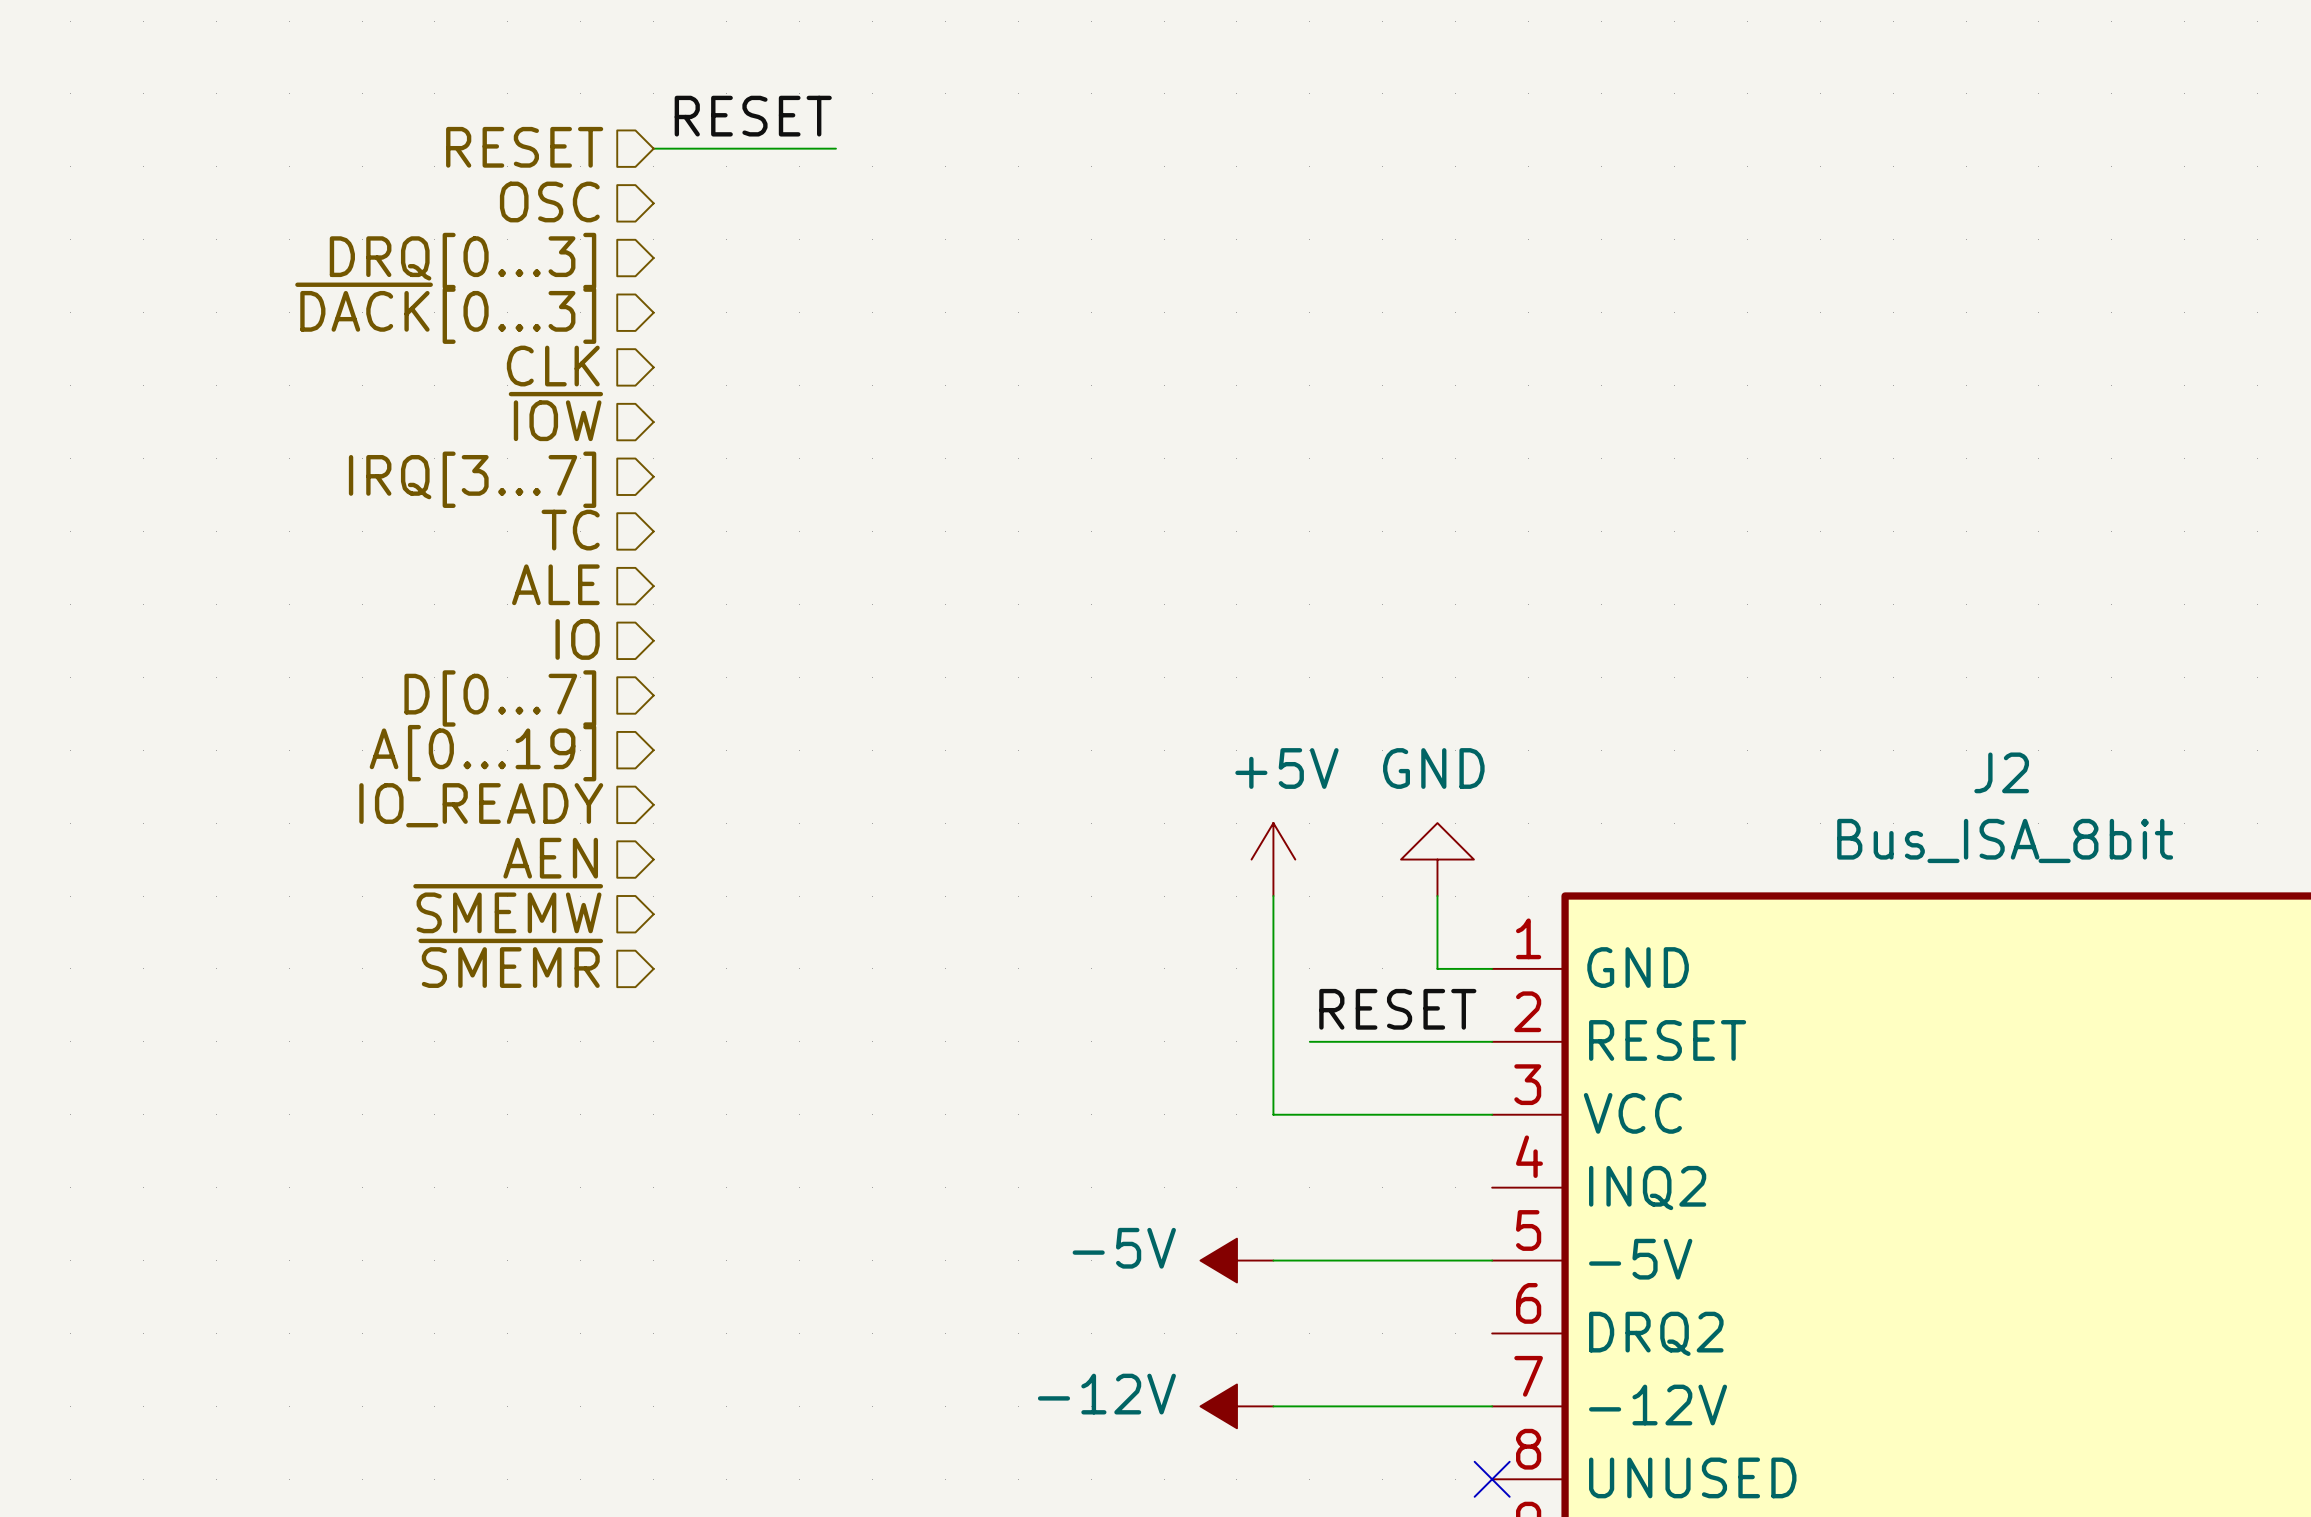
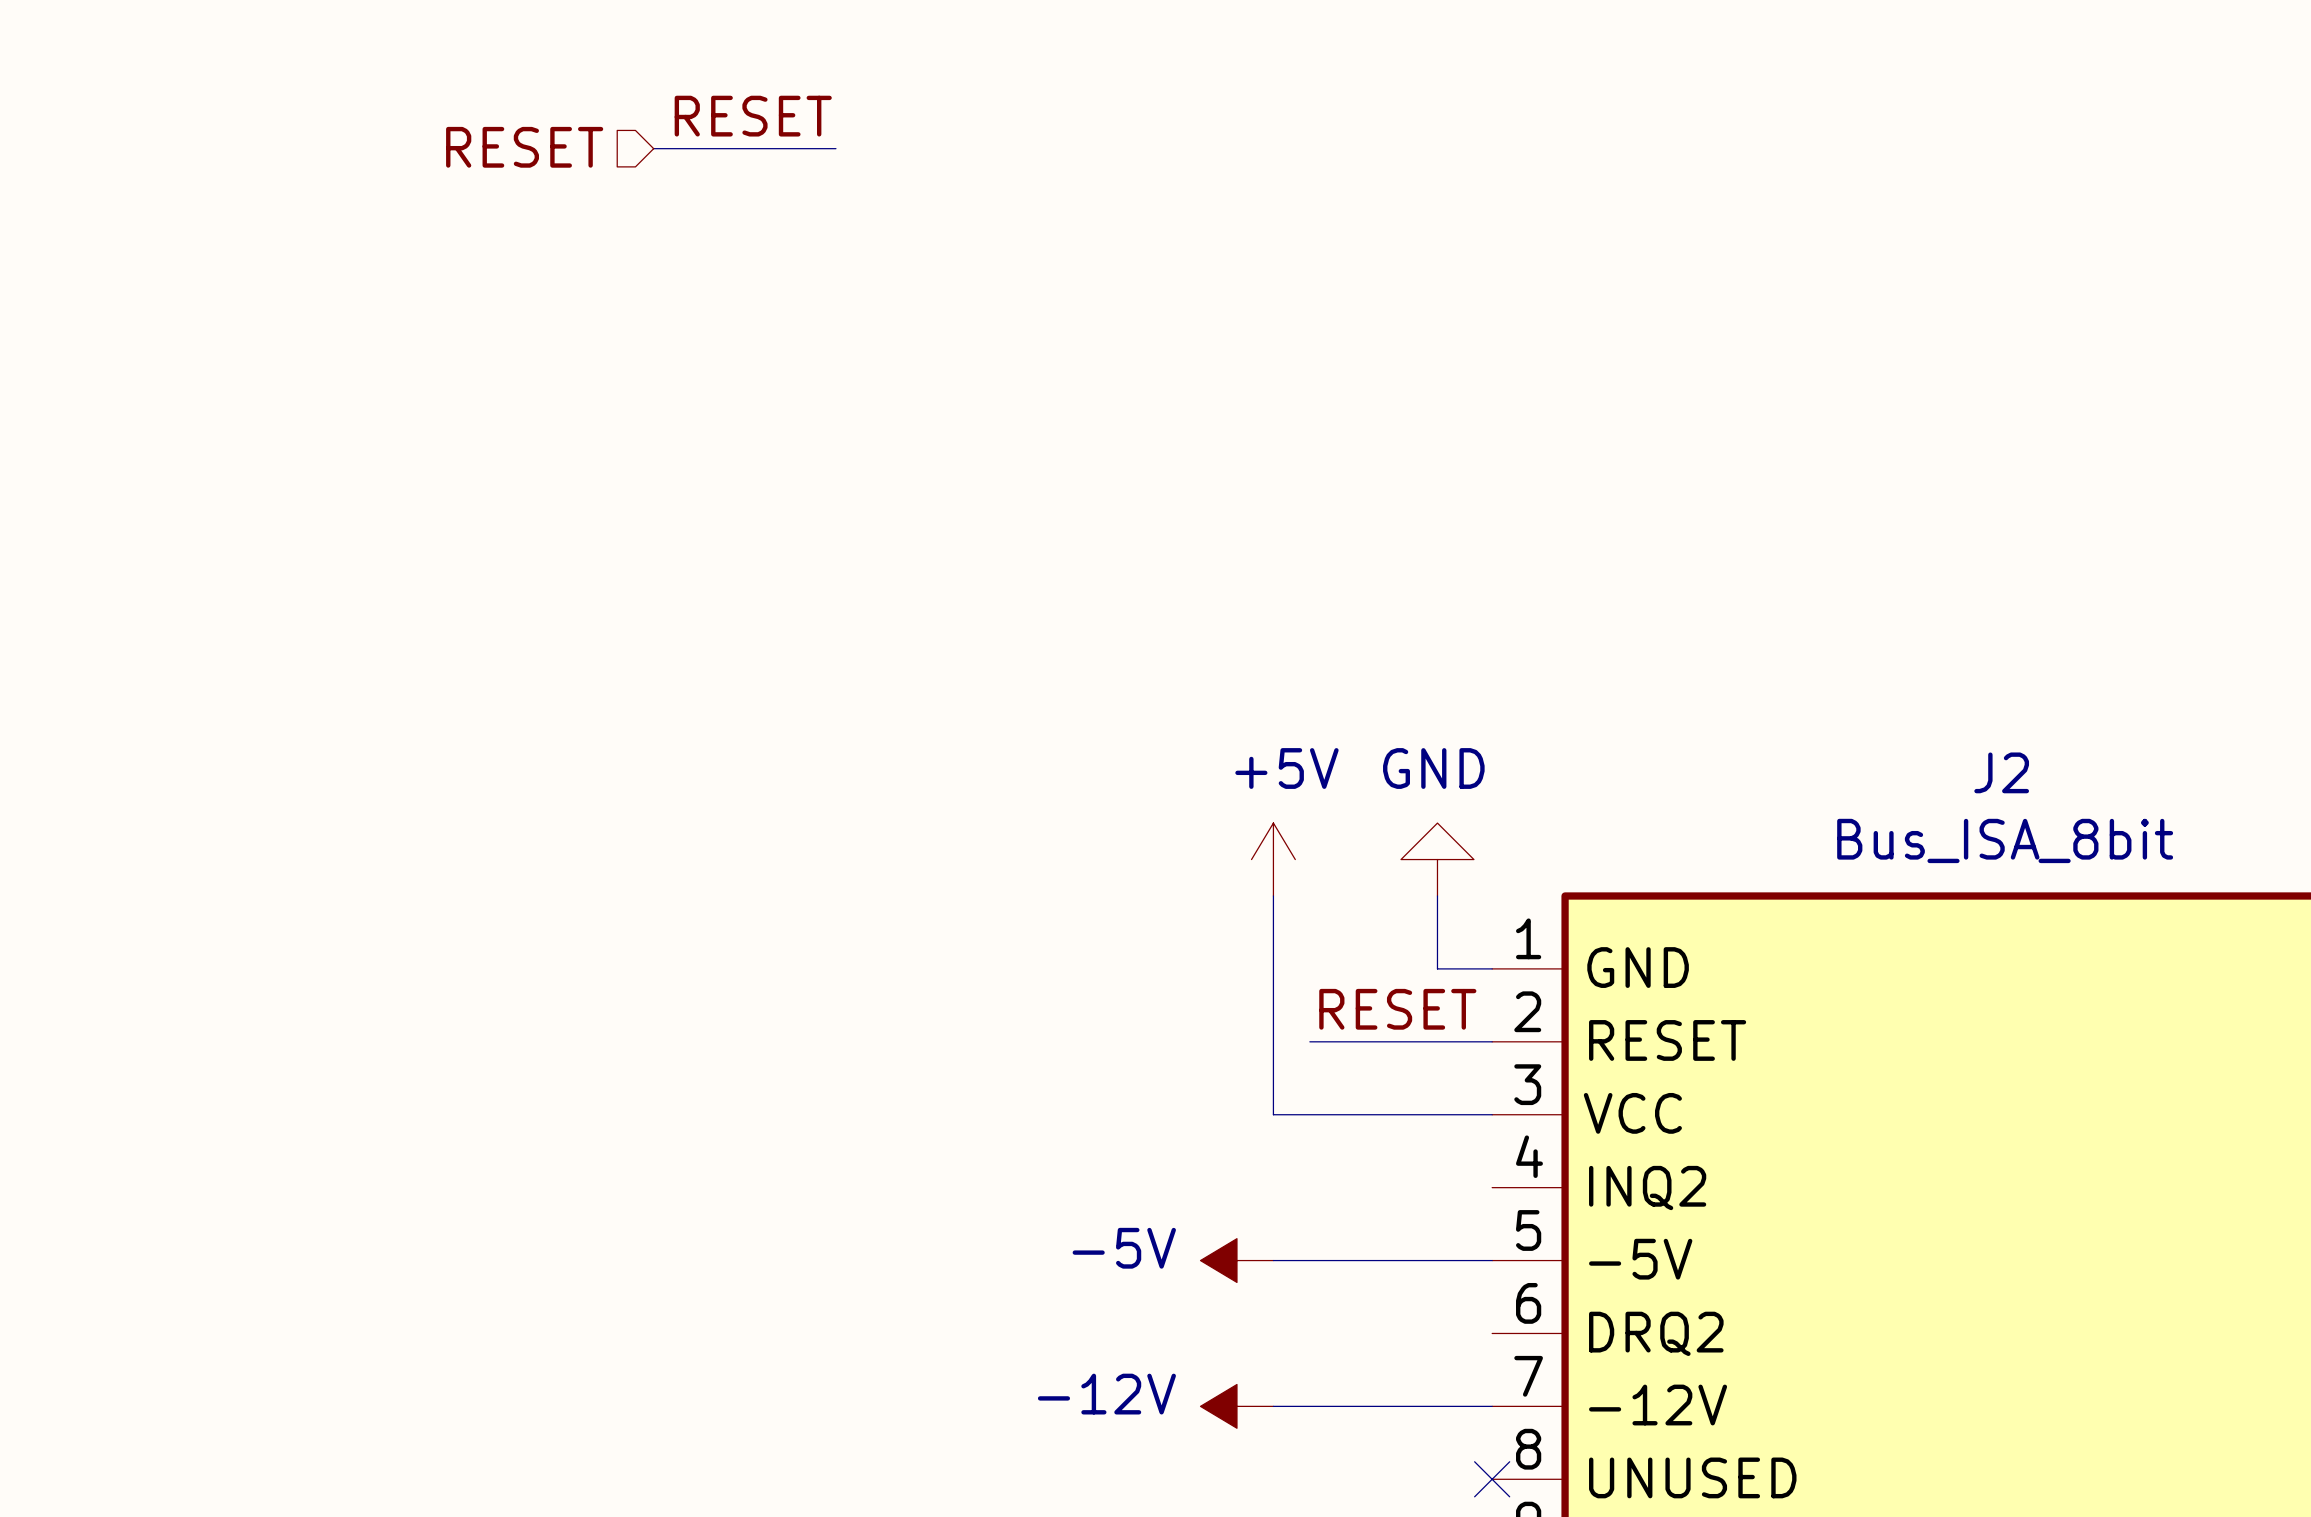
hierarchical label: OSC (549, 201) -> none
hierarchical label: DRQ[0...3] (463, 261) -> none
hierarchical label: ~{DACK}[0...3] (445, 313) -> none
hierarchical label: CLK (553, 366) -> none
hierarchical label: ~{IOW} (555, 416) -> none
hierarchical label: IRQ[3...7] (472, 479) -> none
hierarchical label: TC (570, 530) -> none
hierarchical label: ALE (555, 584) -> none
hierarchical label: IO (577, 639) -> none
hierarchical label: D[0...7] (500, 698) -> none
hierarchical label: A[0...19] (482, 753) -> none
hierarchical label: IO_READY (481, 805) -> none
hierarchical label: AEN (550, 858) -> none
hierarchical label: ~{SMEMW} (508, 908) -> none
hierarchical label: ~{SMEMR} (510, 963) -> none

